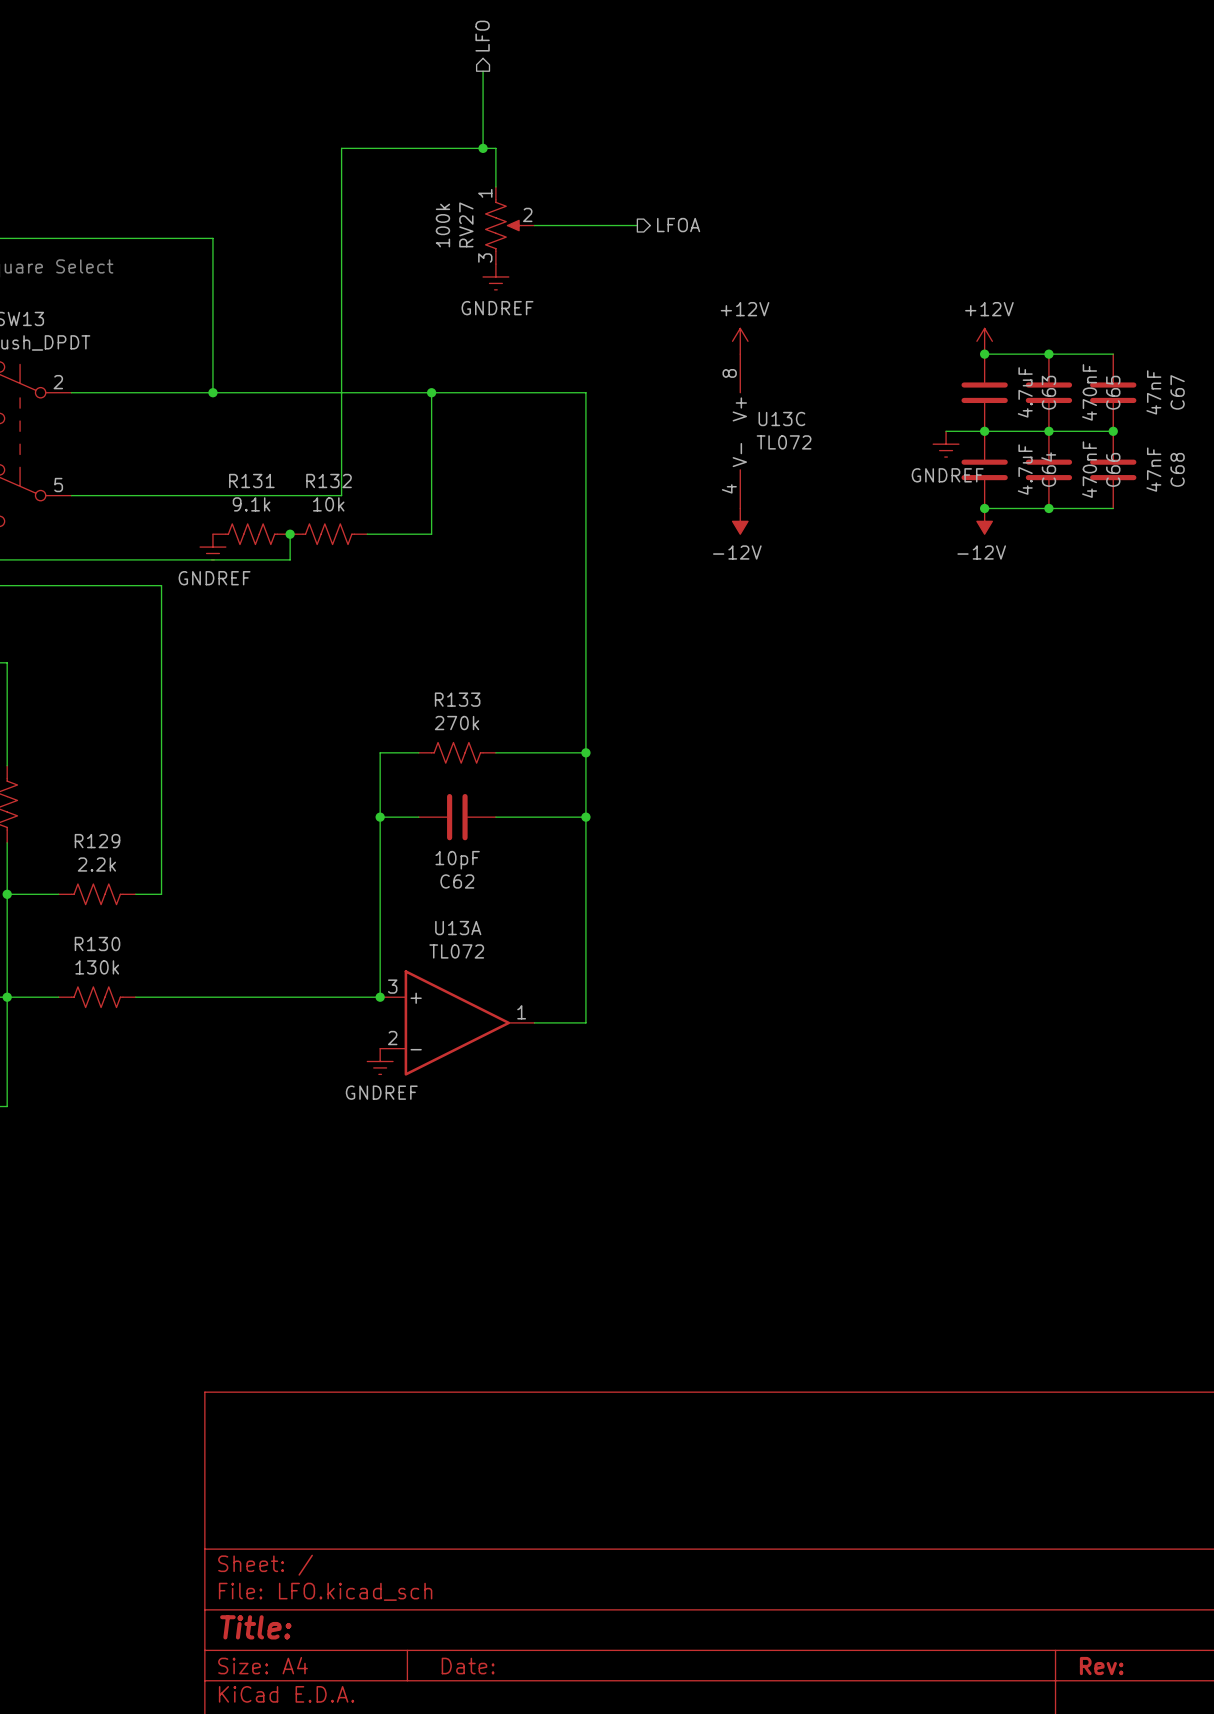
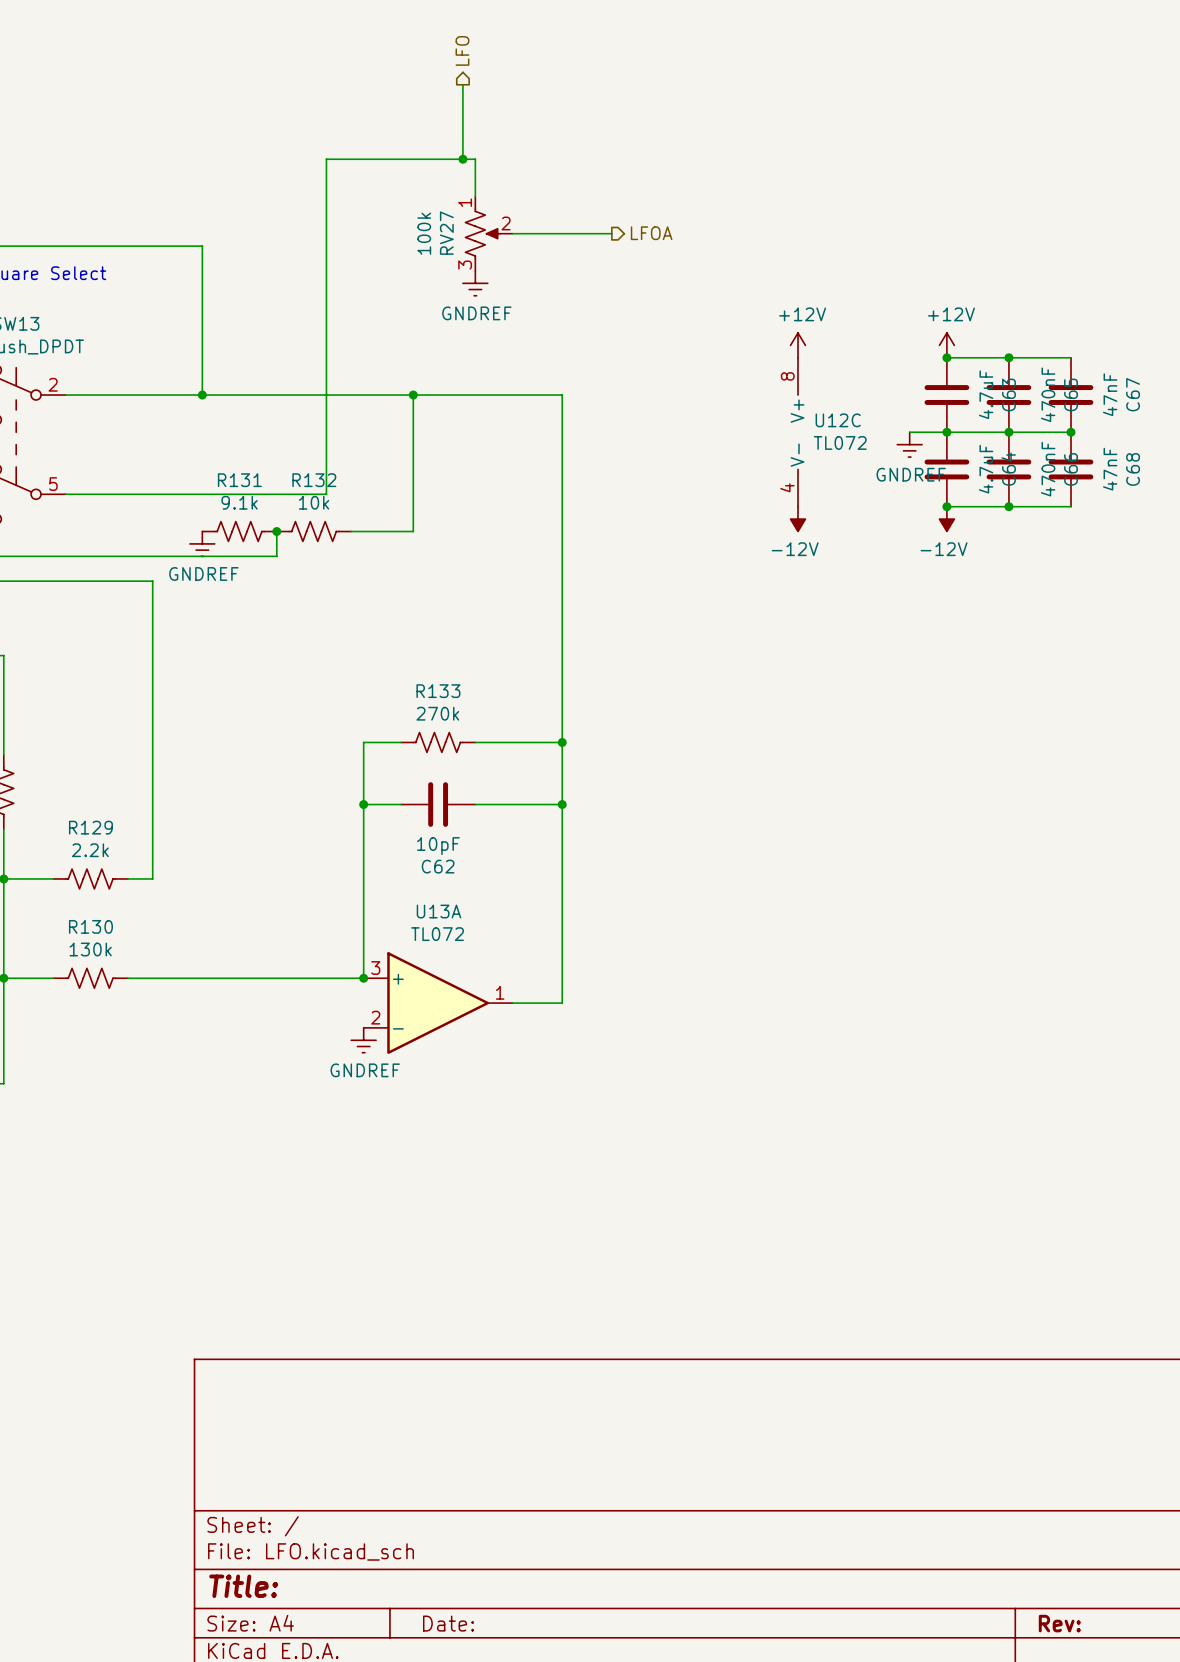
power symbol position: +12V (740, 341) -> +12V (797, 345)
U13C: TL072 (740, 431) -> none
U12C: none -> TL072 (797, 432)
power symbol position: -12V (740, 521) -> -12V (797, 519)

